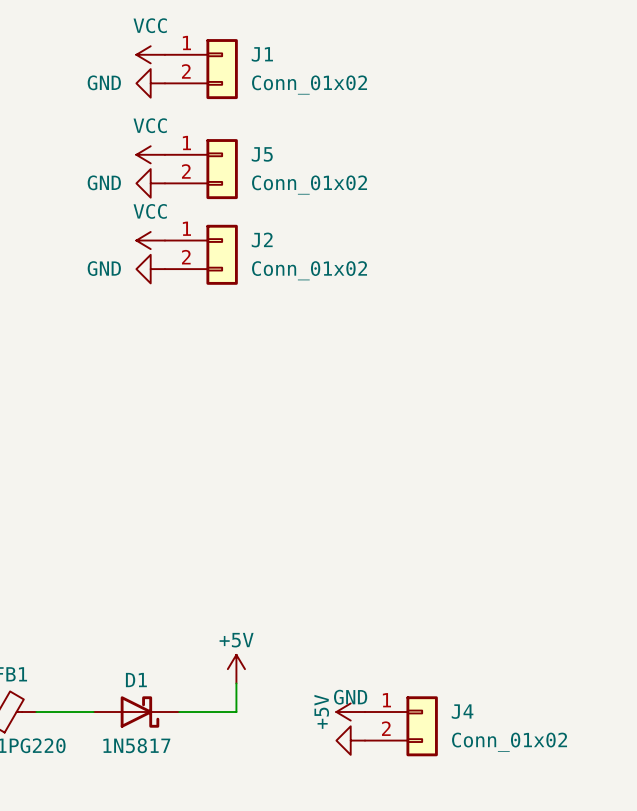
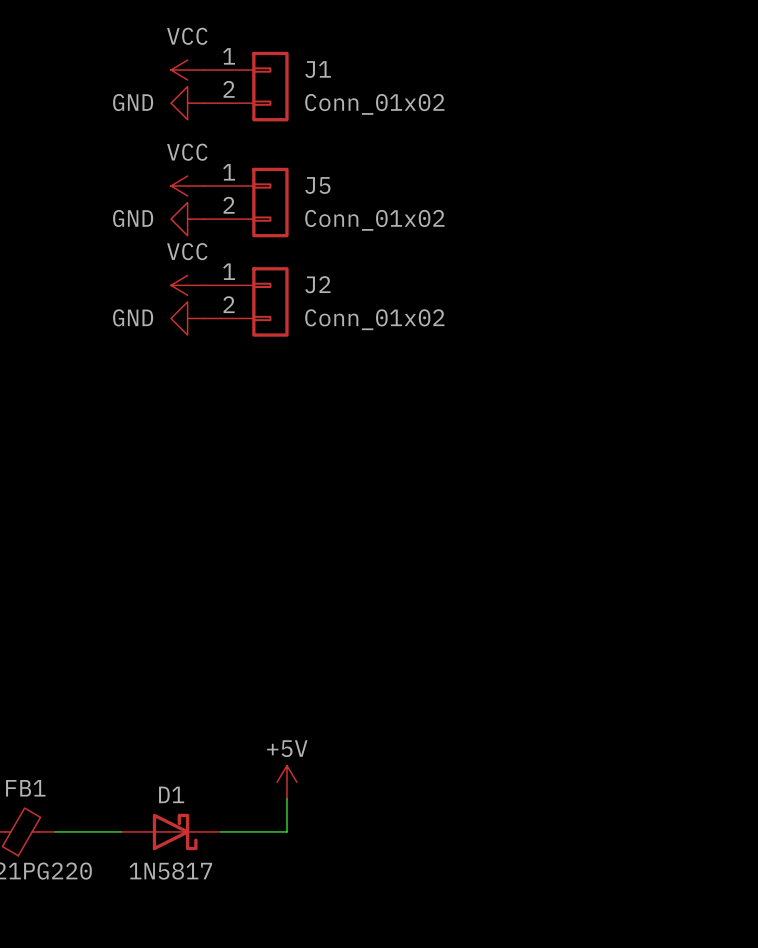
power symbol: +5V (350, 712) -> none
J4: Conn_01x02 (401, 726) -> none
power symbol: GND (350, 740) -> none

